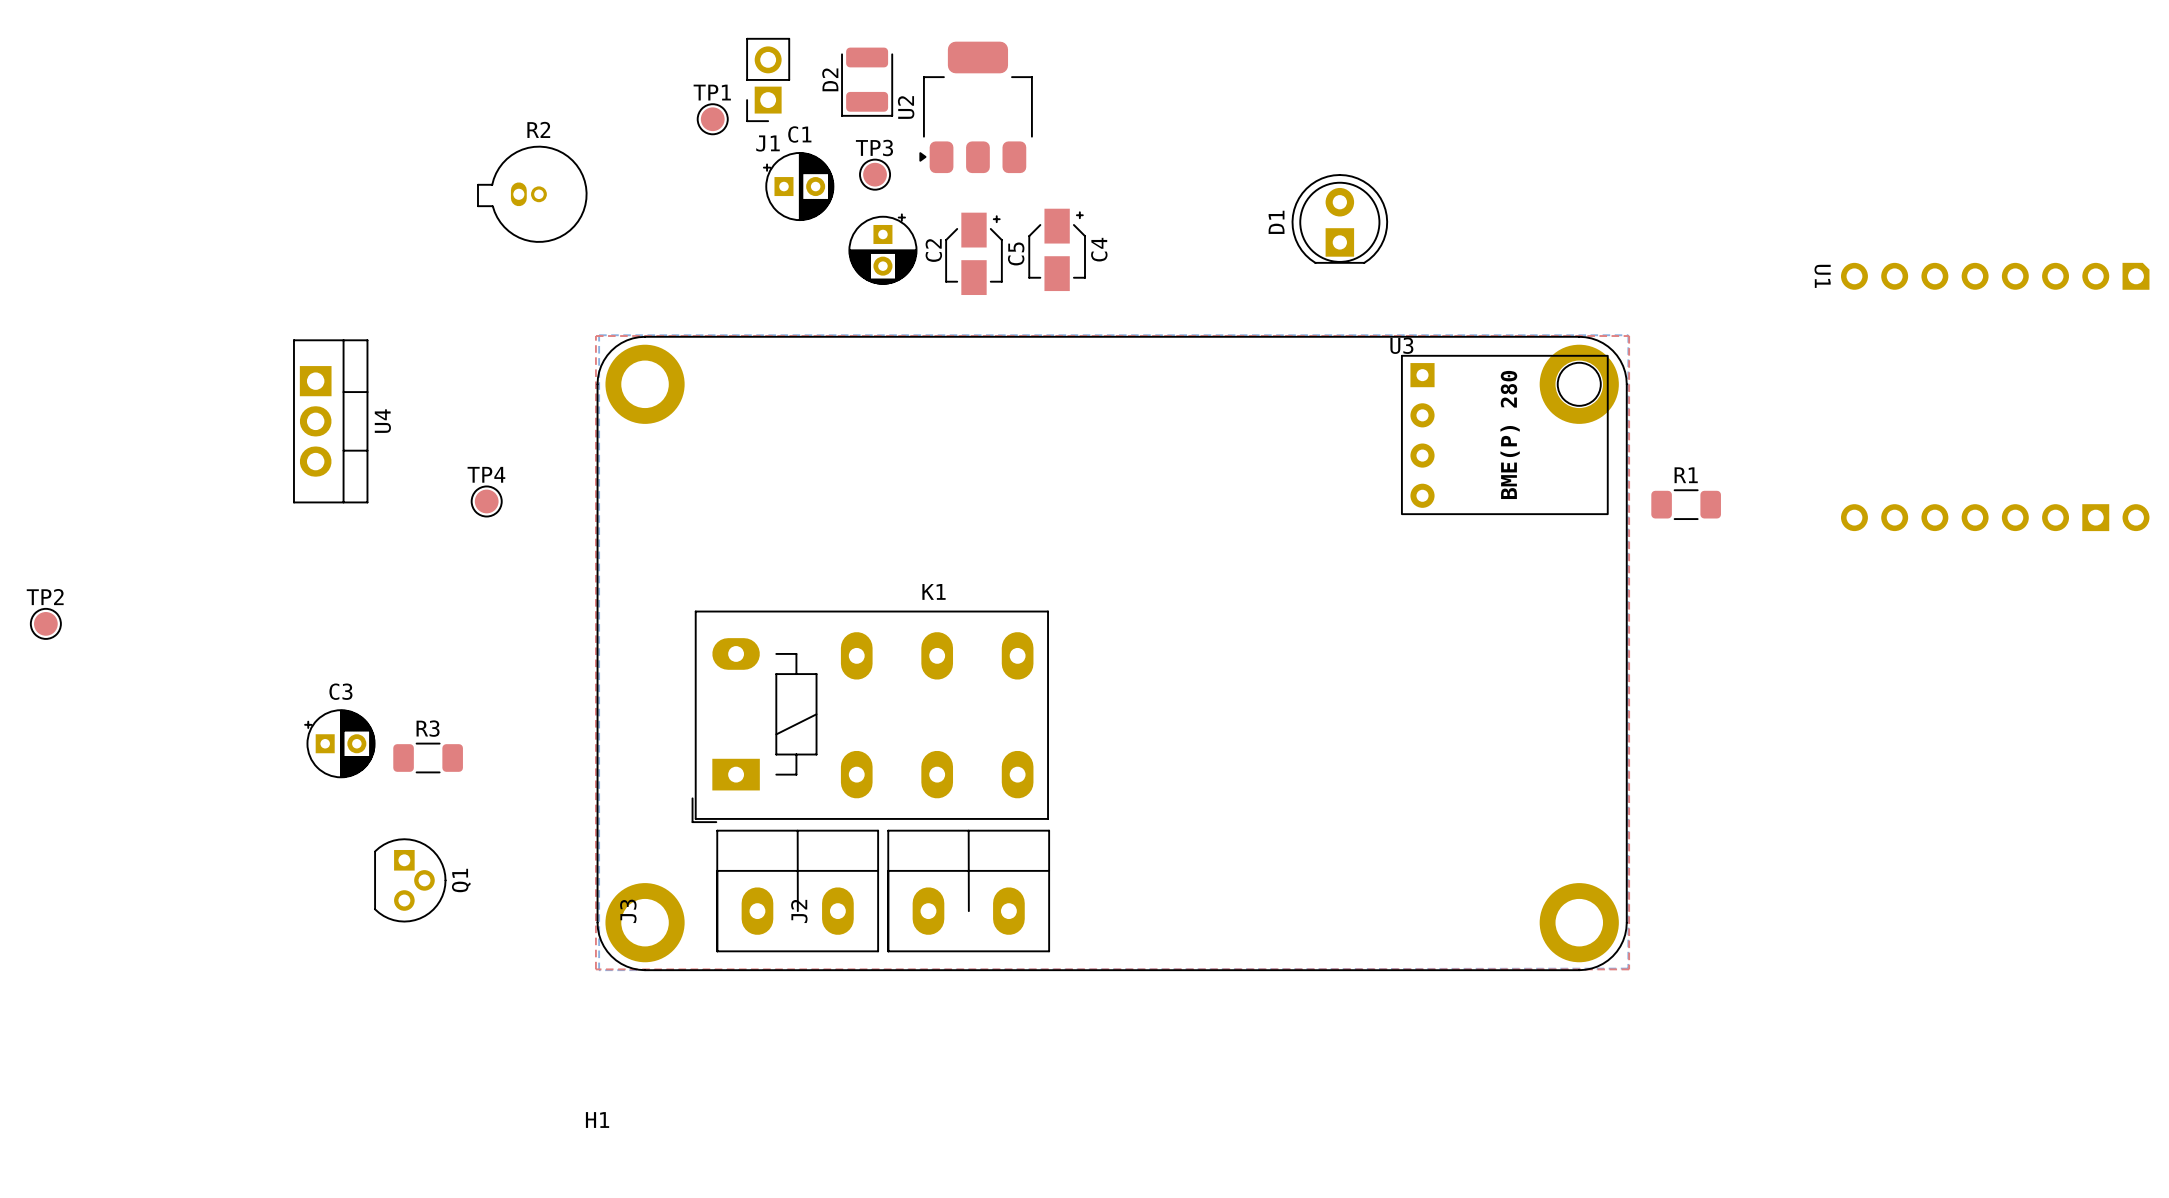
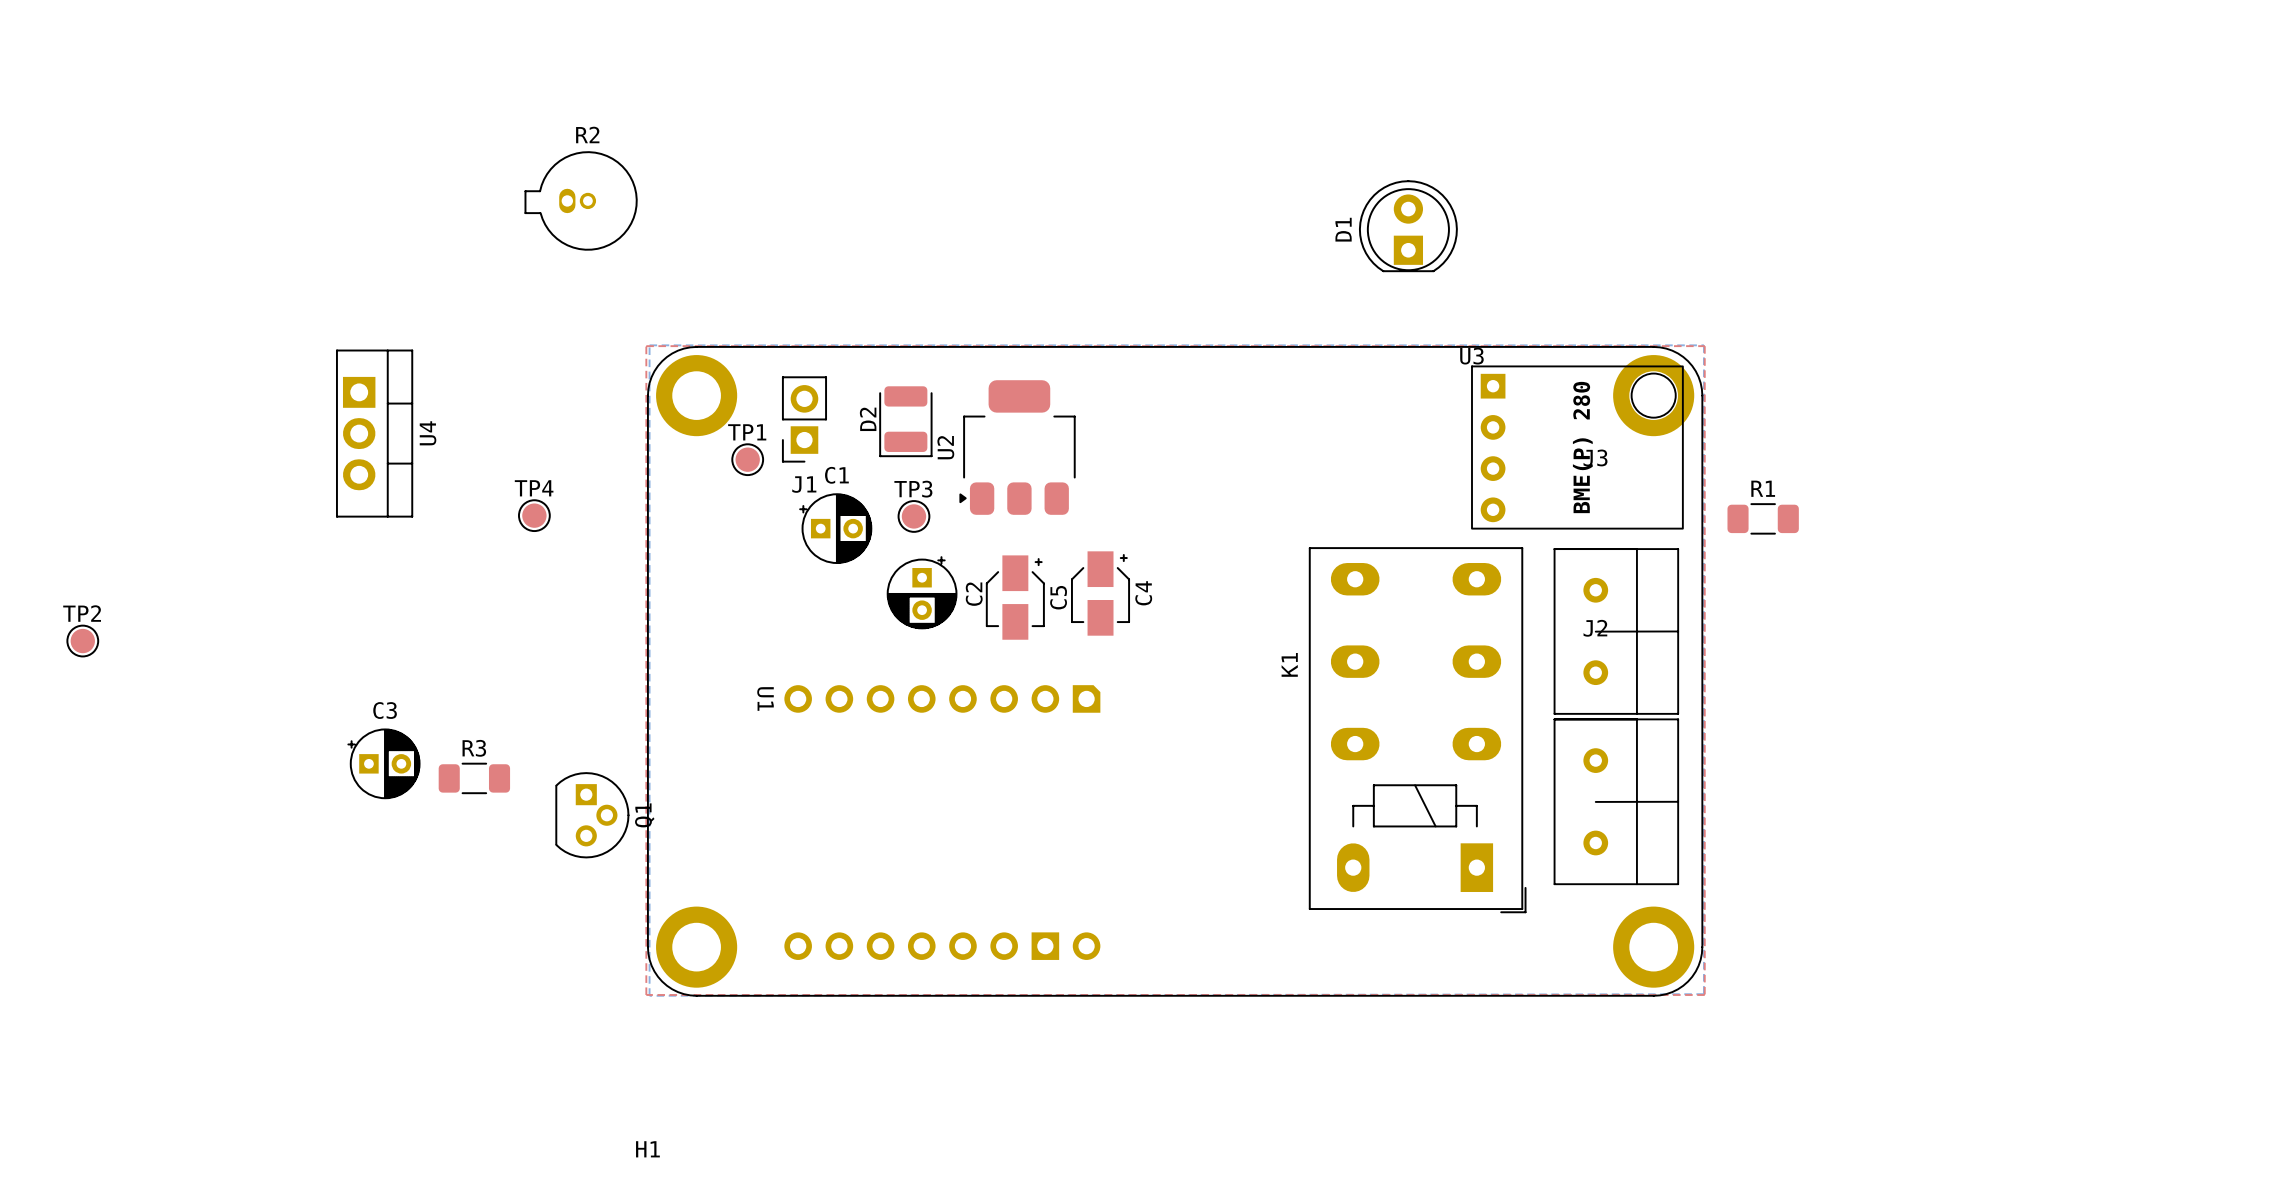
J1 position: (768, 79) -> (804, 419)
D2 position: (867, 82) -> (905, 421)
U2 position: (976, 107) -> (1017, 447)
TP1 position: (712, 119) -> (747, 459)
TP3 position: (875, 174) -> (913, 516)
C1 position: (798, 186) -> (835, 528)
C2 position: (882, 249) -> (922, 592)
C4 position: (1057, 249) -> (1100, 593)
C5 position: (974, 253) -> (1015, 597)
U1 position: (1995, 396) -> (942, 822)
K1 rotation: 0° (870, 716) -> 90° counterclockwise (1417, 730)
K1 position: (870, 716) -> (1417, 730)
J3 footprint: [716, 829, 879, 953] -> [1553, 548, 1679, 715]
J2 footprint: [887, 829, 1050, 953] -> [1553, 718, 1679, 886]
Q1 position: (410, 880) -> (592, 815)
J3 name position: J3 (628, 911) -> J3 (1595, 457)
J2 name position: J2 (799, 911) -> J2 (1595, 628)

